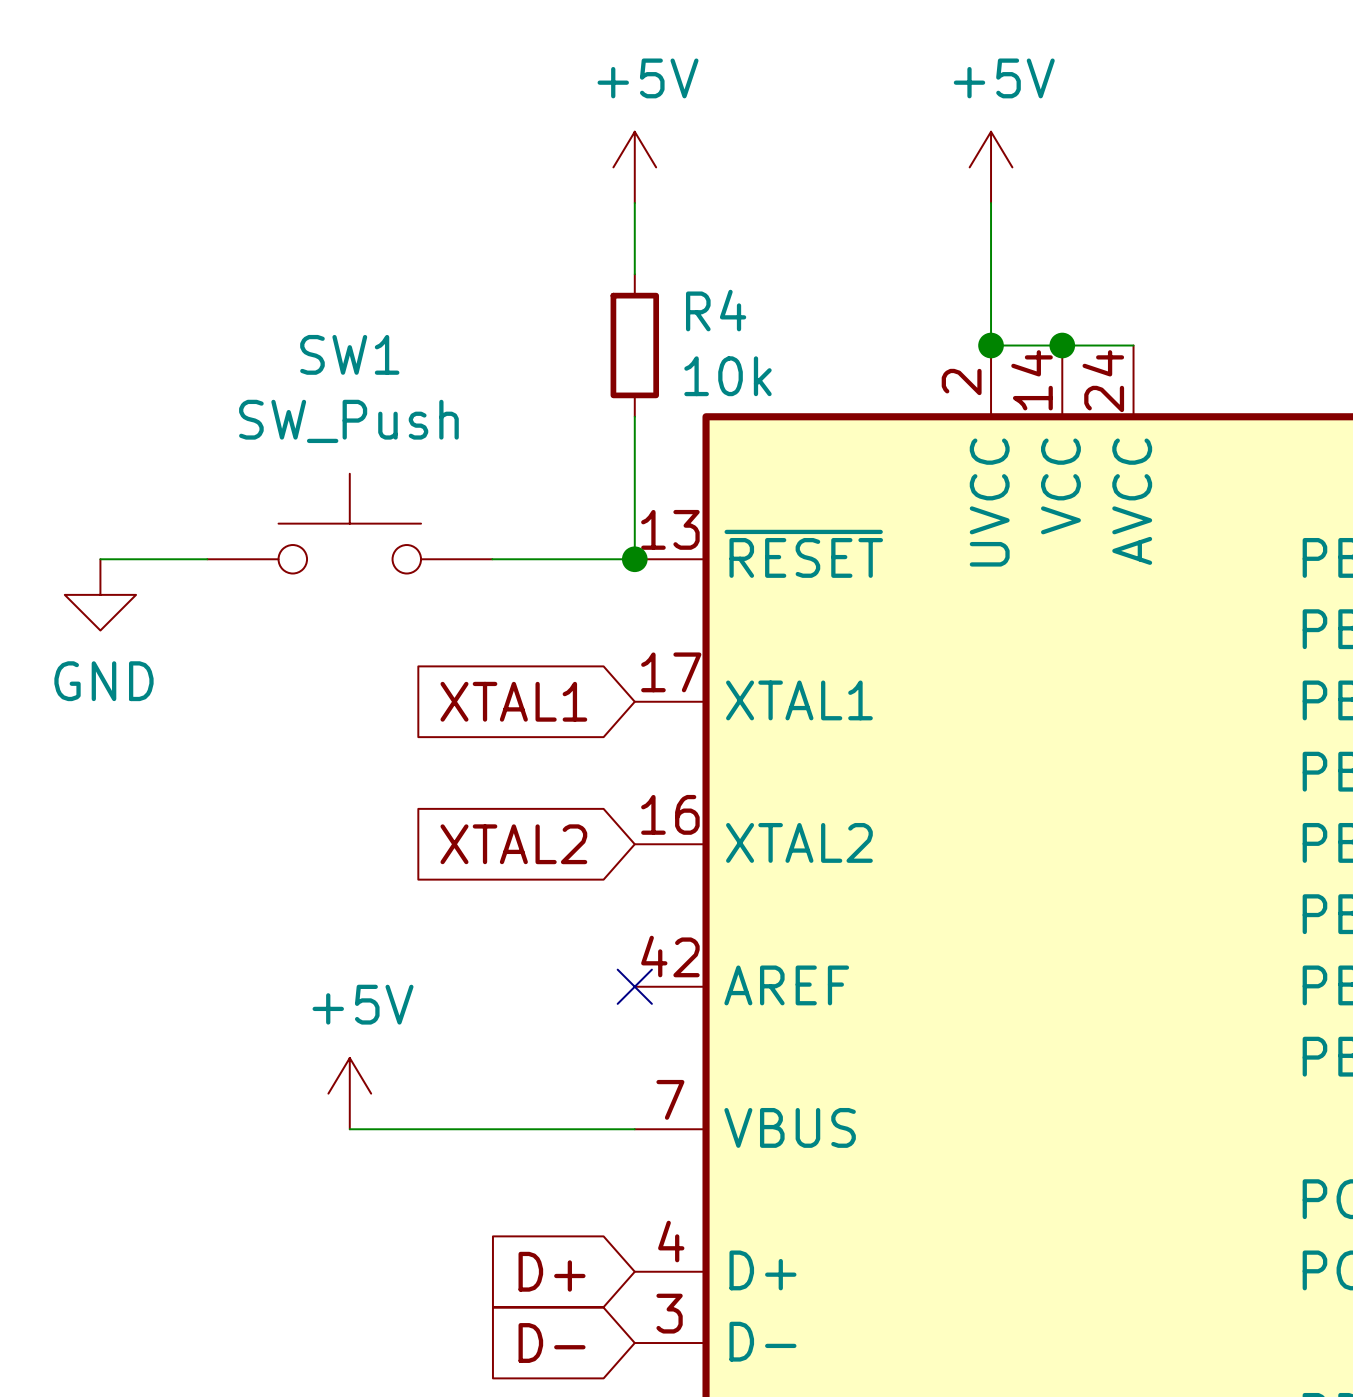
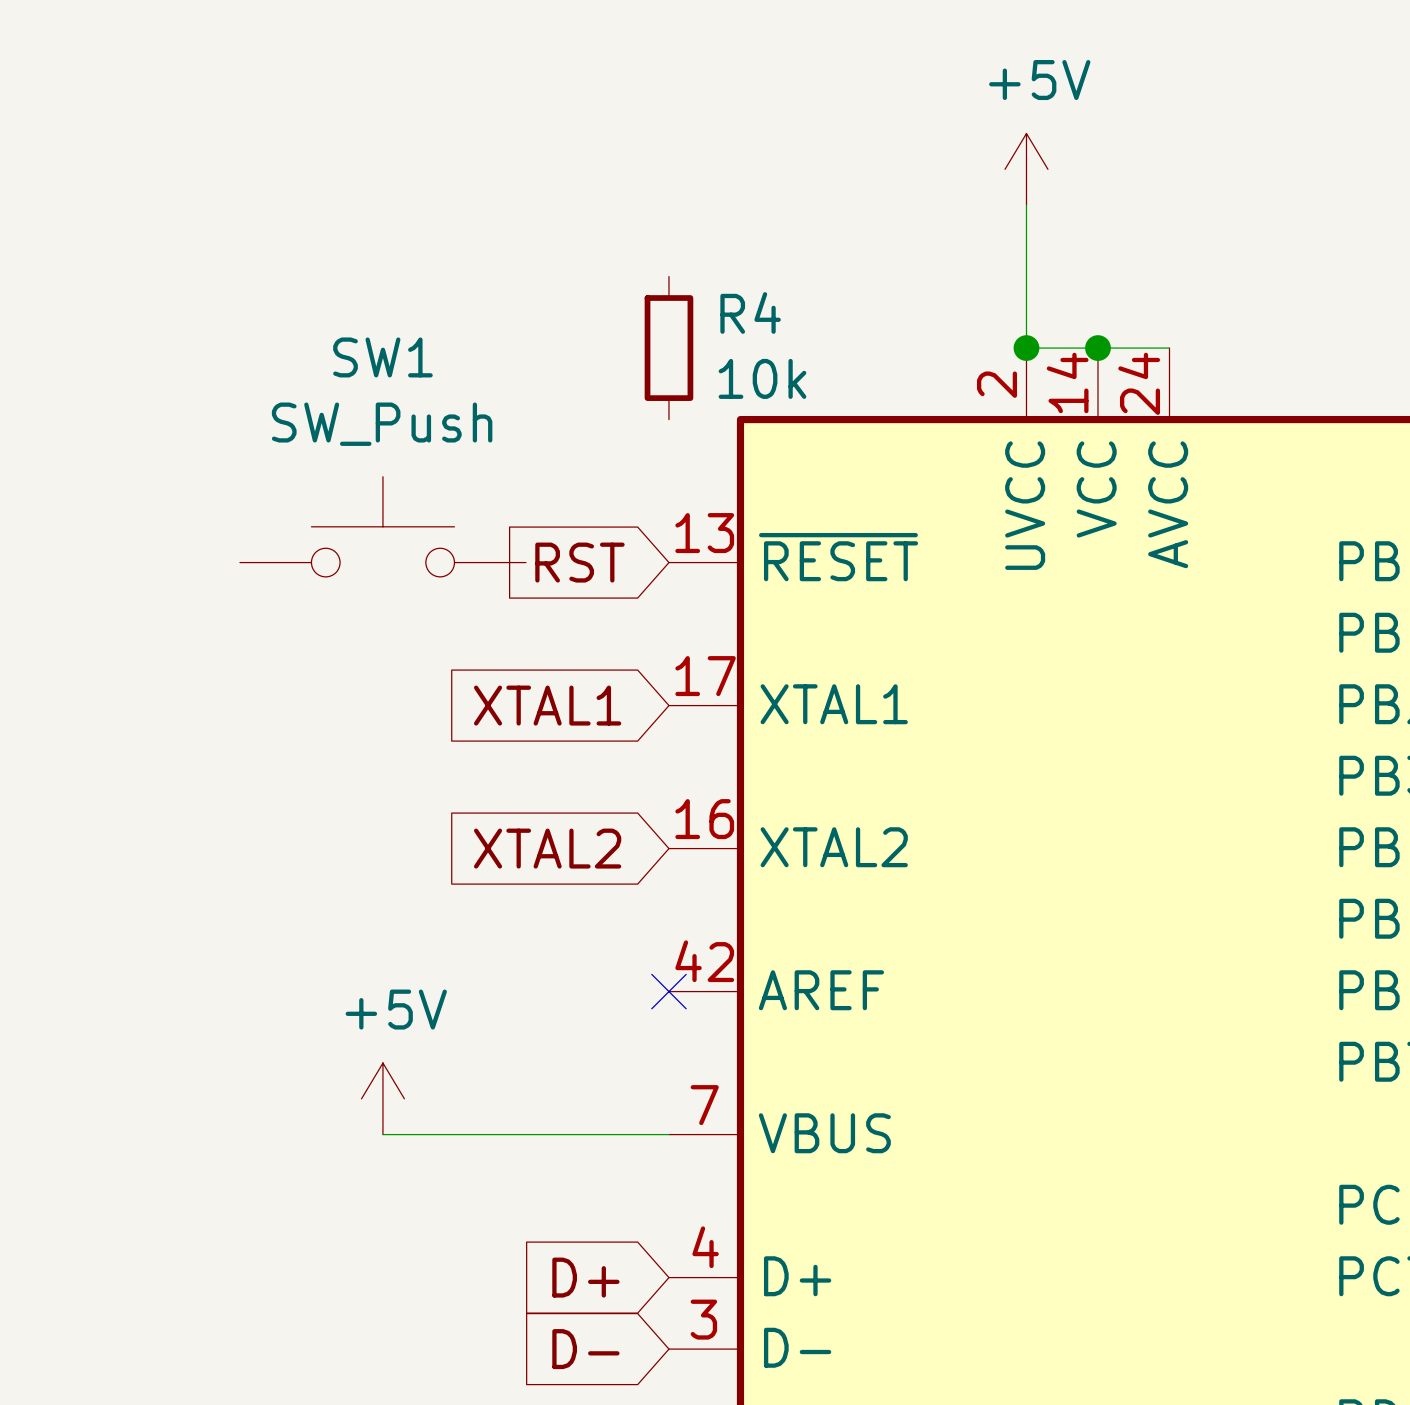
power symbol: +5V (634, 167) -> none
wire: (634, 203) (634, 274) -> none
wire: (634, 416) (634, 559) (492, 559) -> none
wire: (100, 559) (207, 559) -> none
global label: none -> RST (579, 562)
junction: (634, 559) -> none
power symbol: GND (100, 594) -> none

